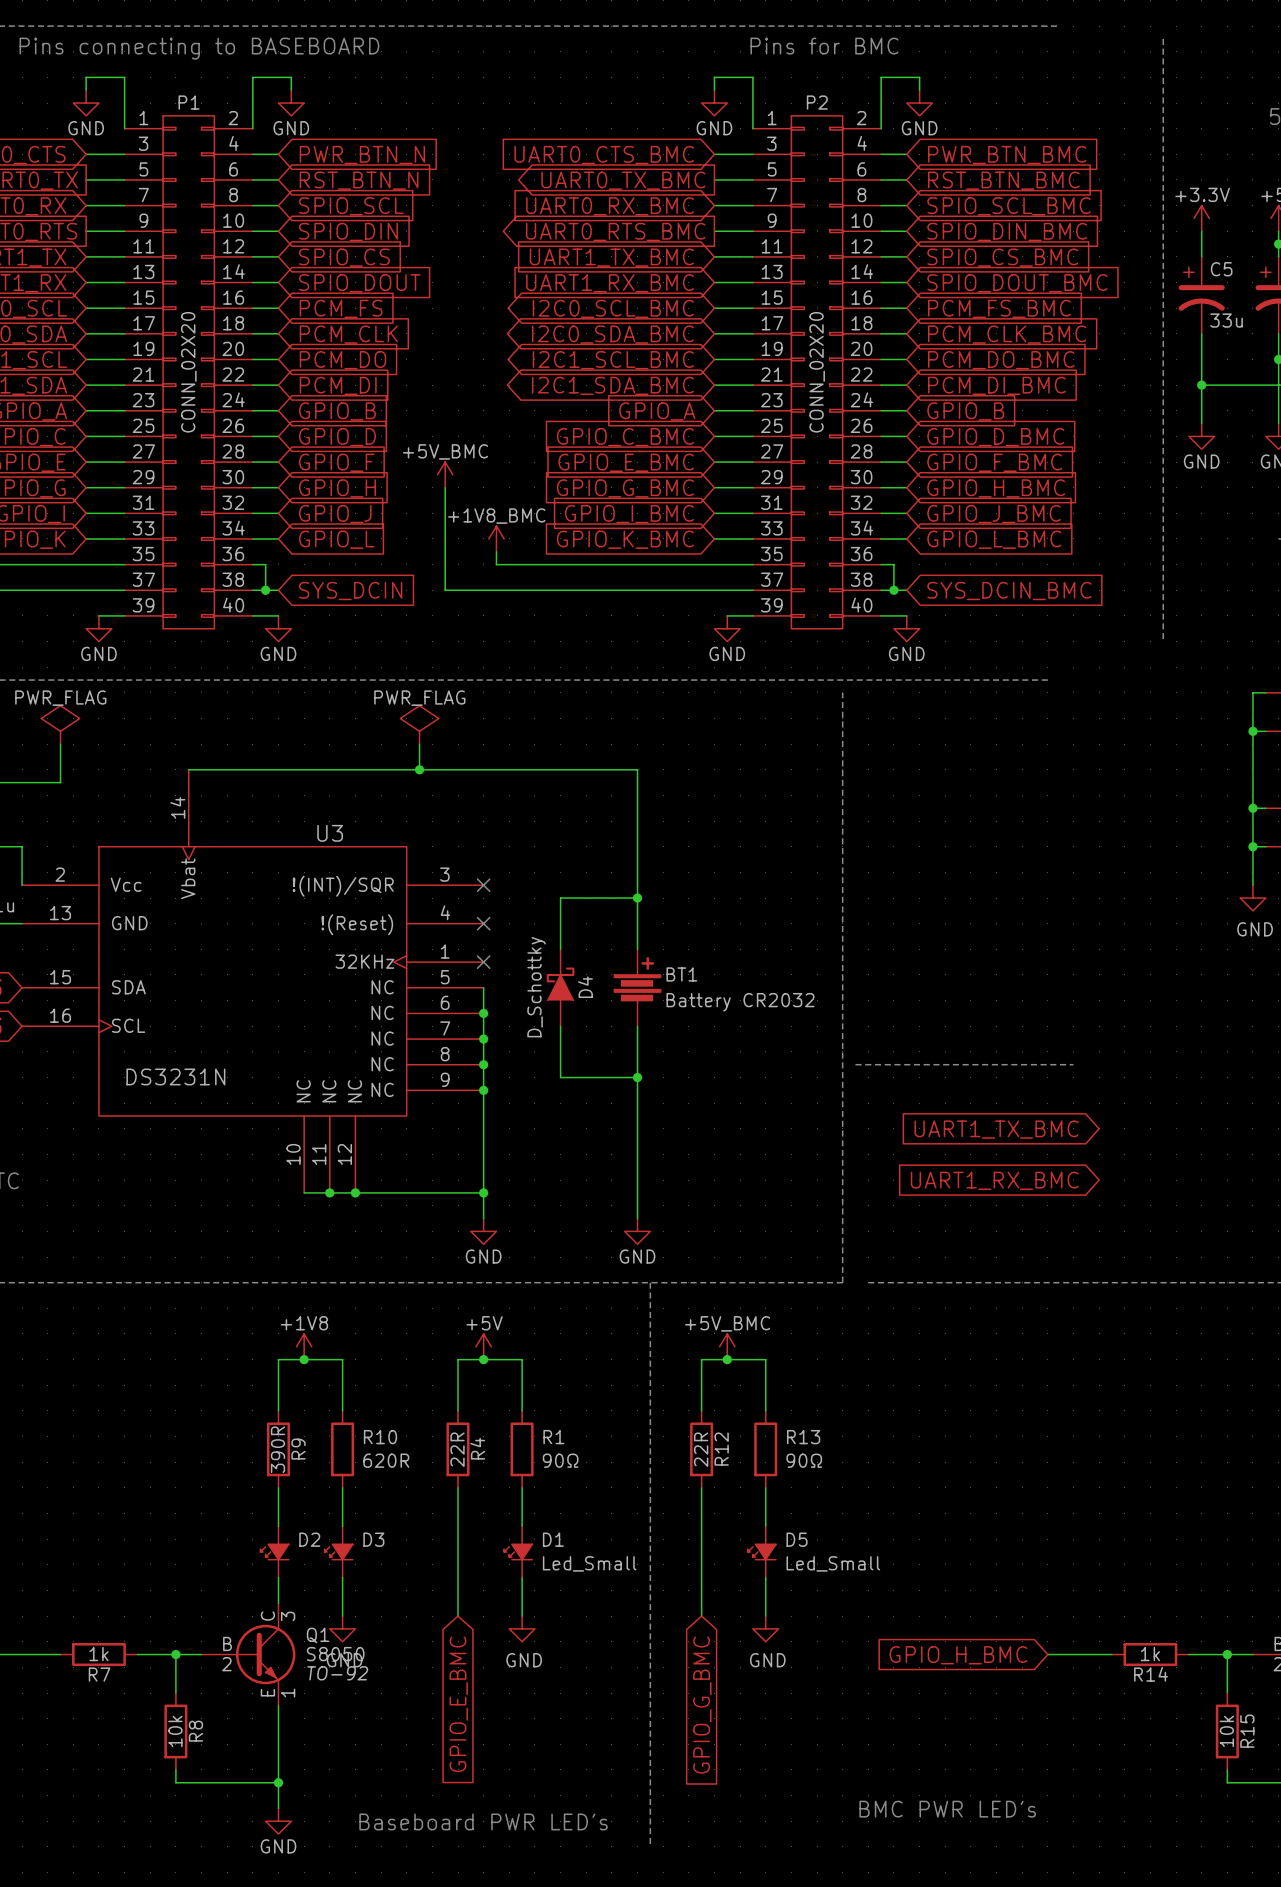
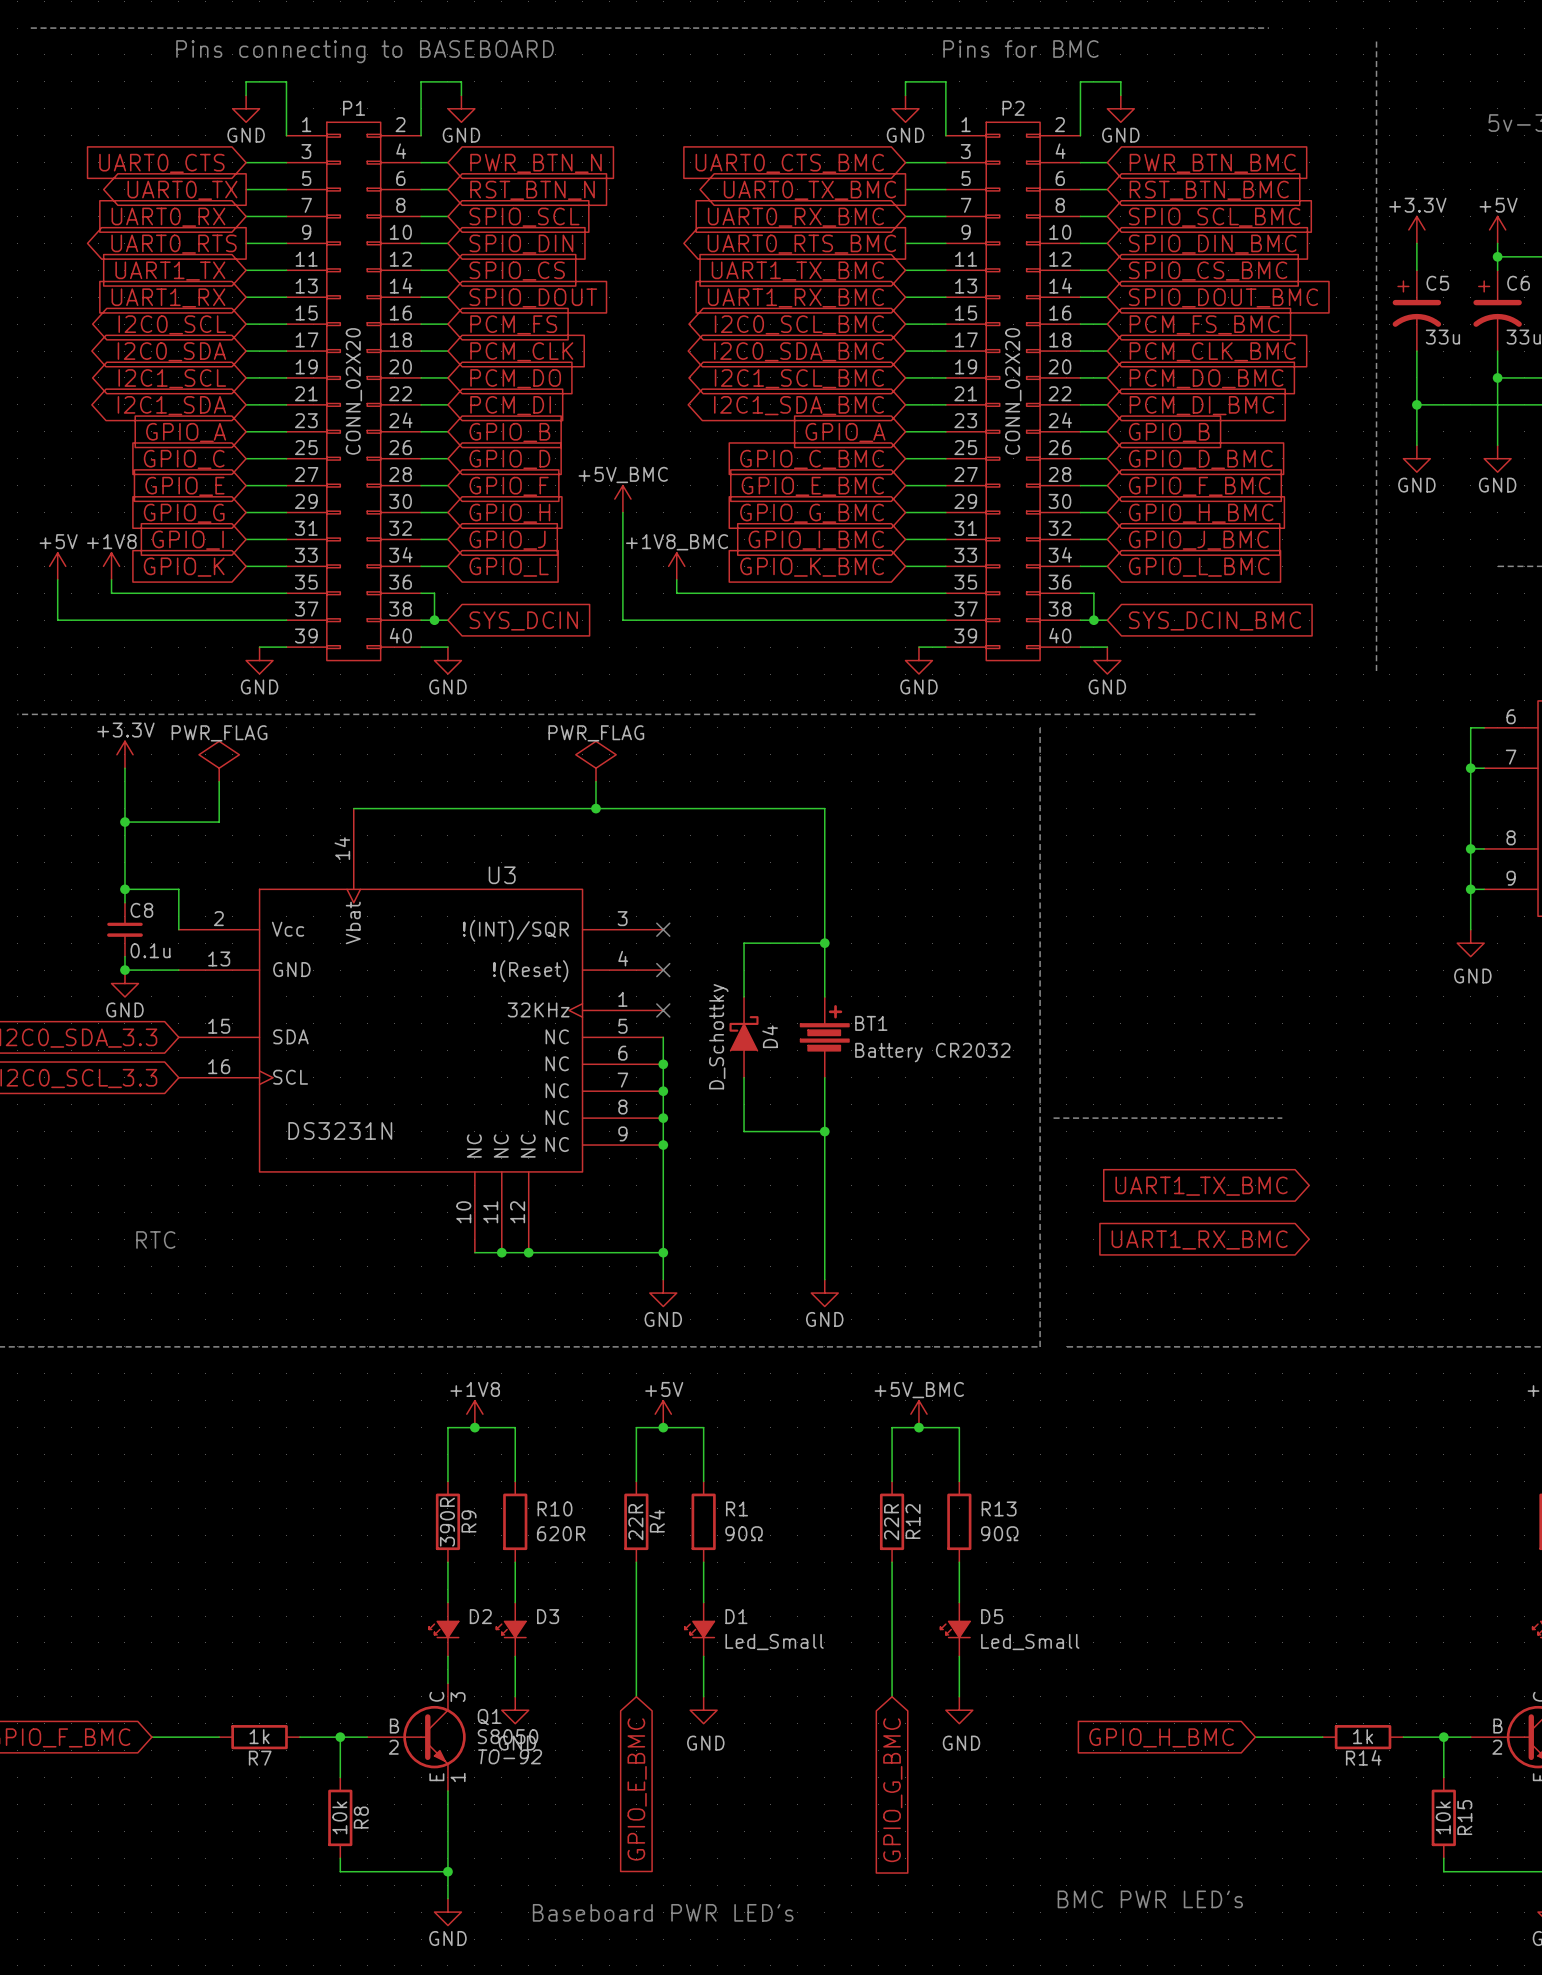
line: (650, 1282) (650, 1846) -> none

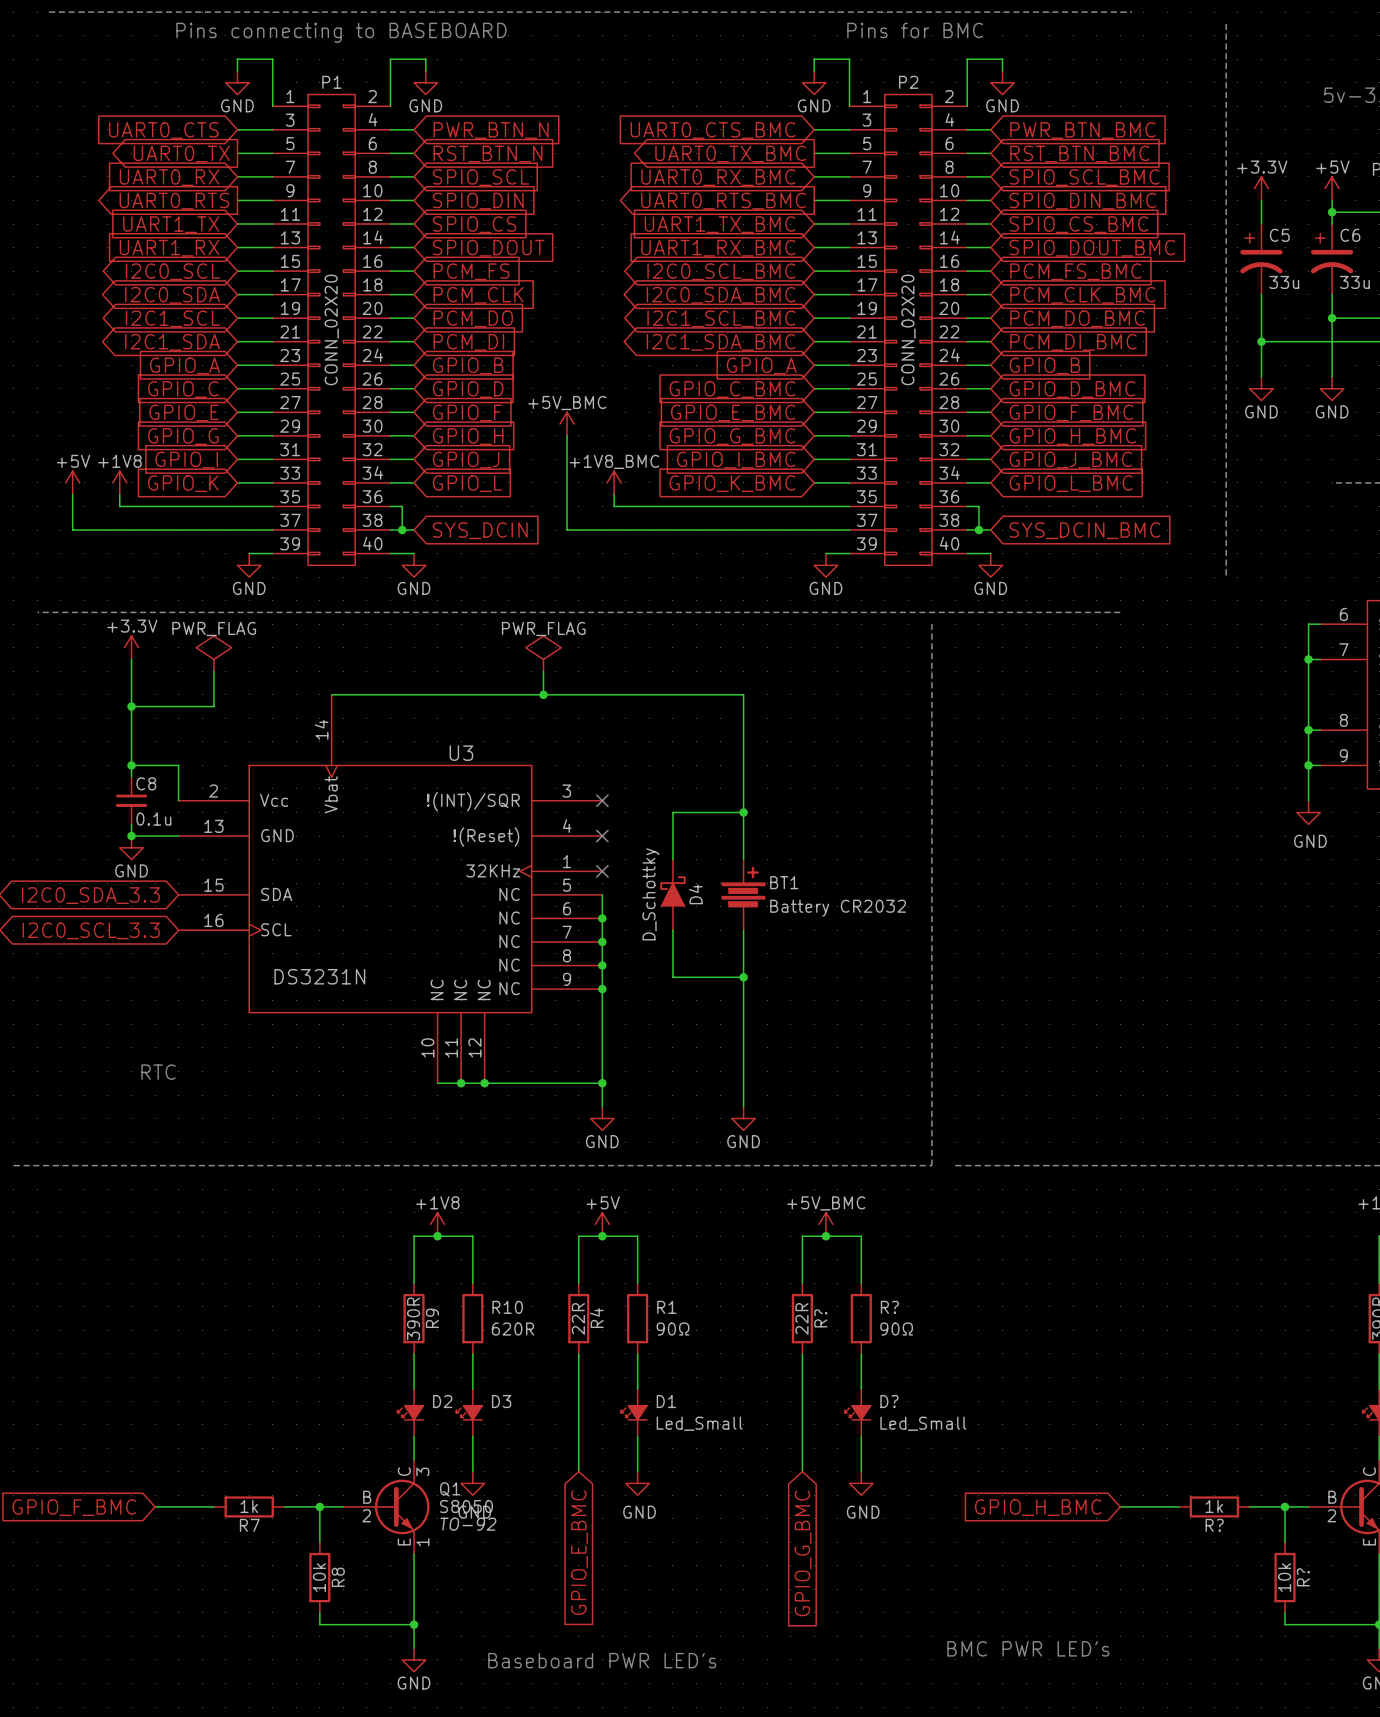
line: (1053, 1118) (1282, 1118) -> none
global label: UART1_TX_BMC (1201, 1186) -> none
global label: UART1_RX_BMC (1199, 1239) -> none
R13 name: R13 (999, 1508) -> R? (889, 1307)
R12 name: R12 (913, 1521) -> R? (820, 1318)
D5 name: D5 (992, 1616) -> D? (889, 1401)
R14 name: R14 (1363, 1757) -> R? (1214, 1525)
R15 name: R15 (1464, 1817) -> R? (1303, 1577)

